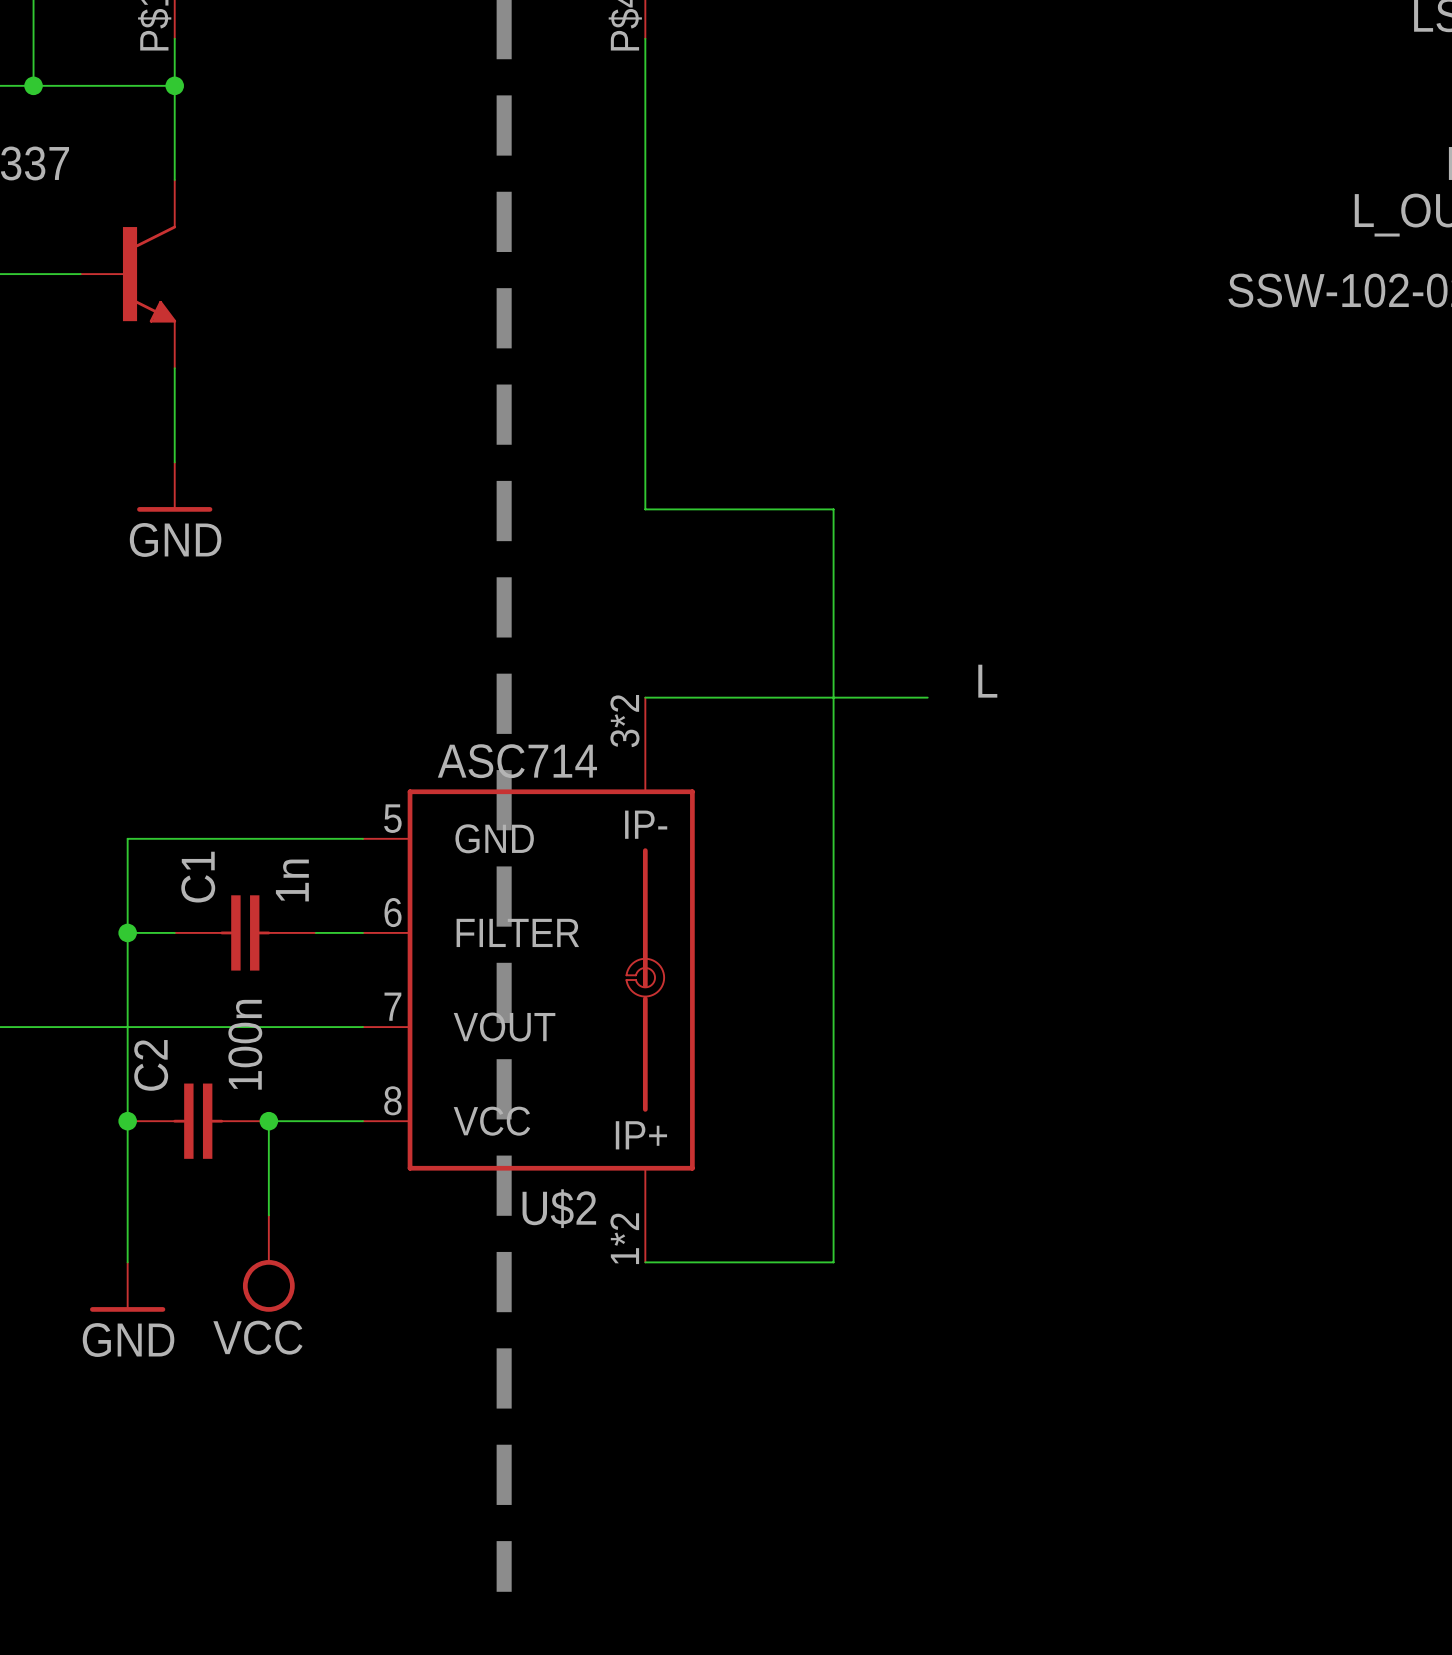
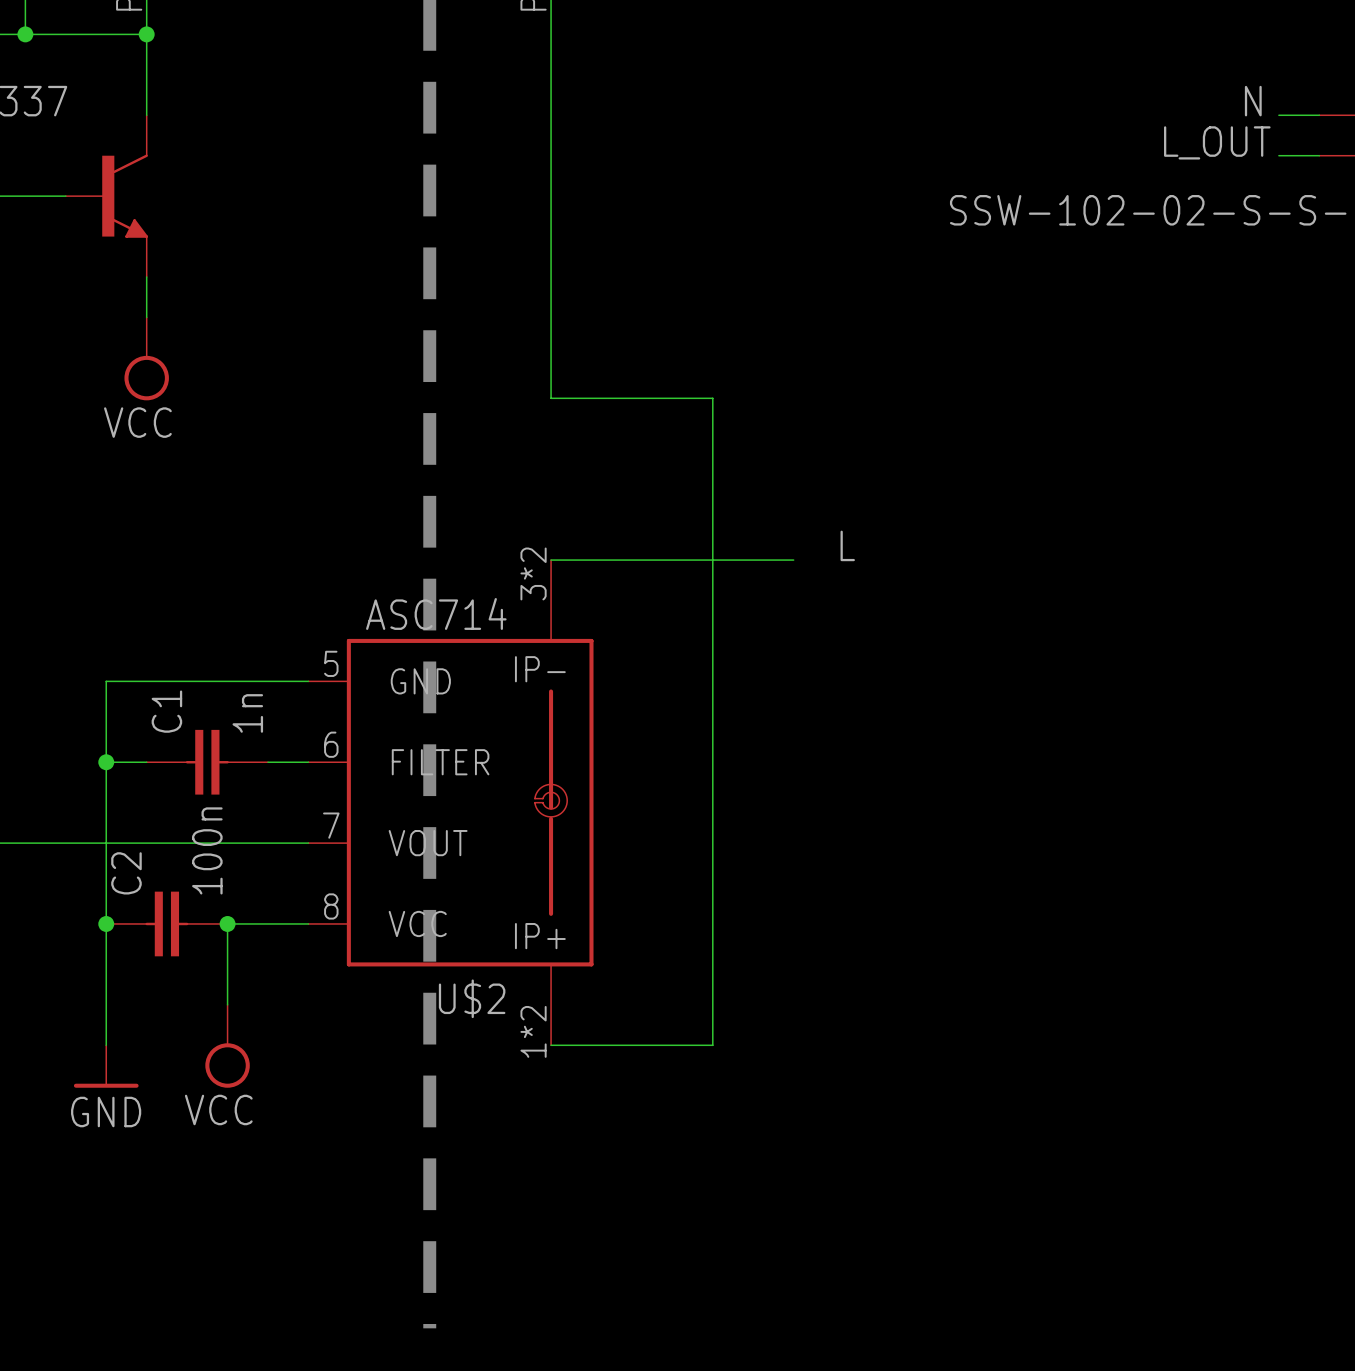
power symbol: none -> VCC (146, 358)
power symbol: GND (174, 487) -> none

